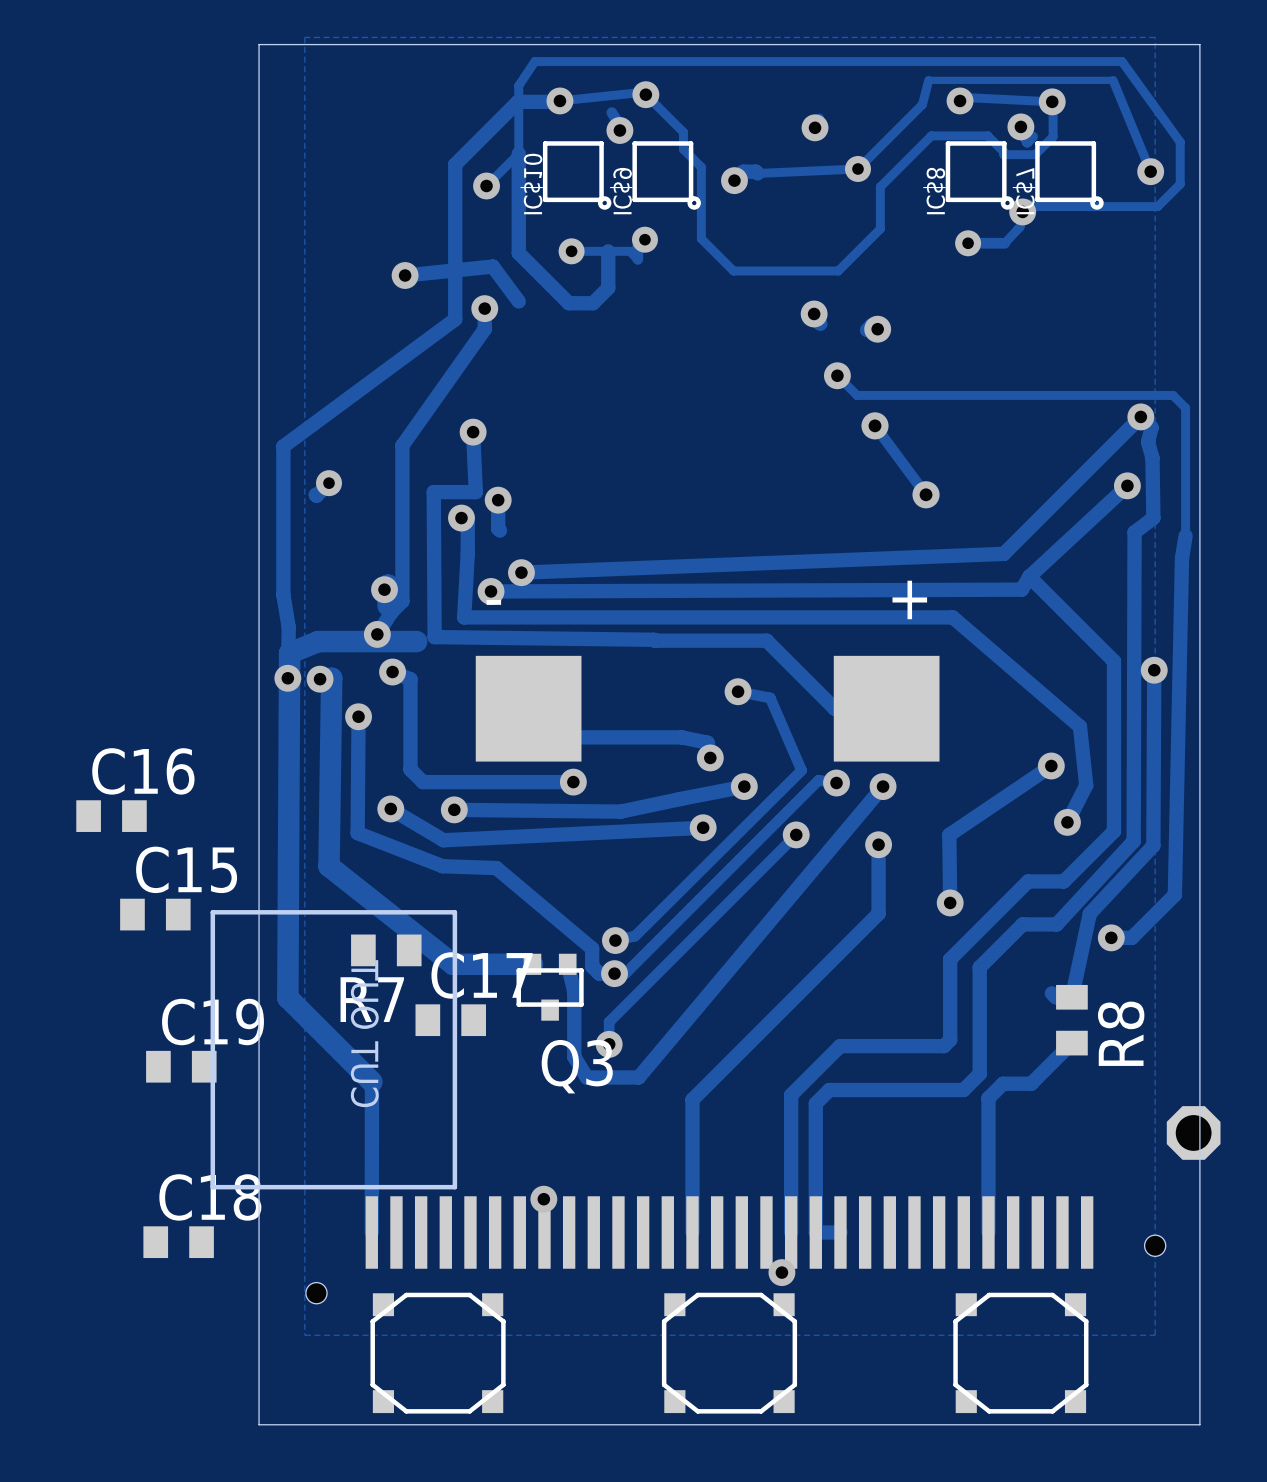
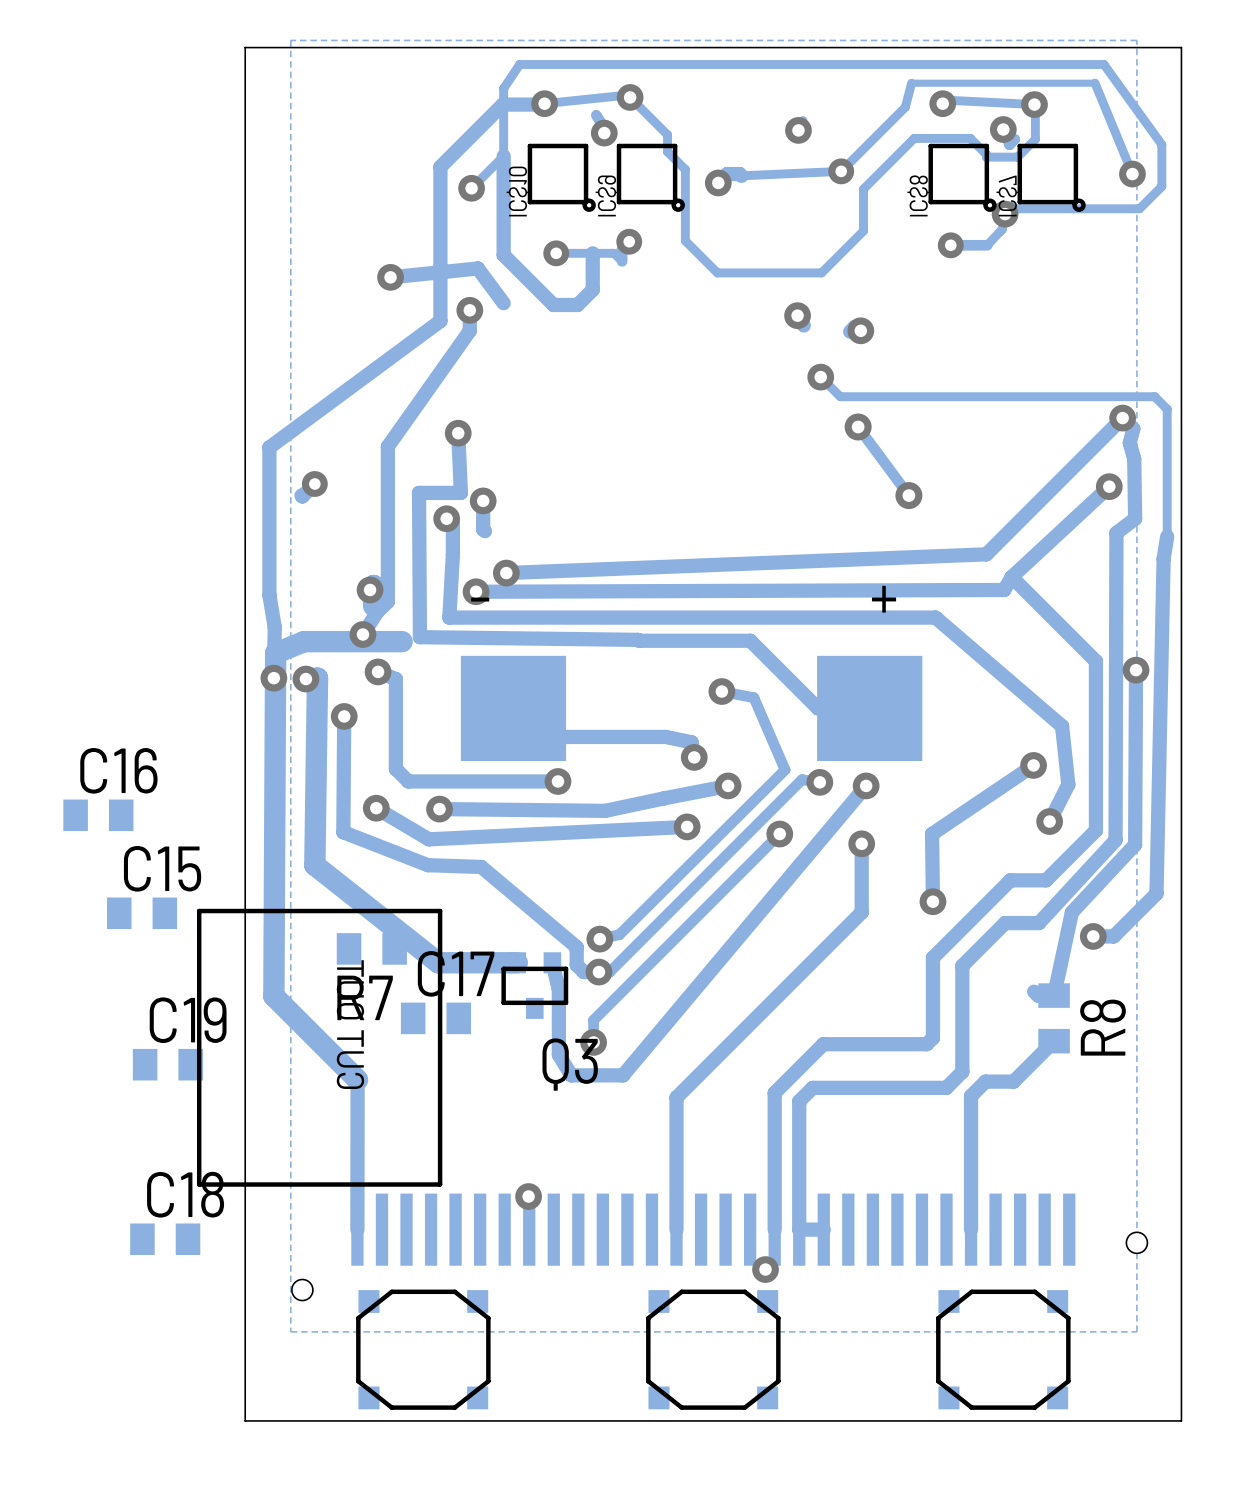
part: (1193, 1132) -> none

